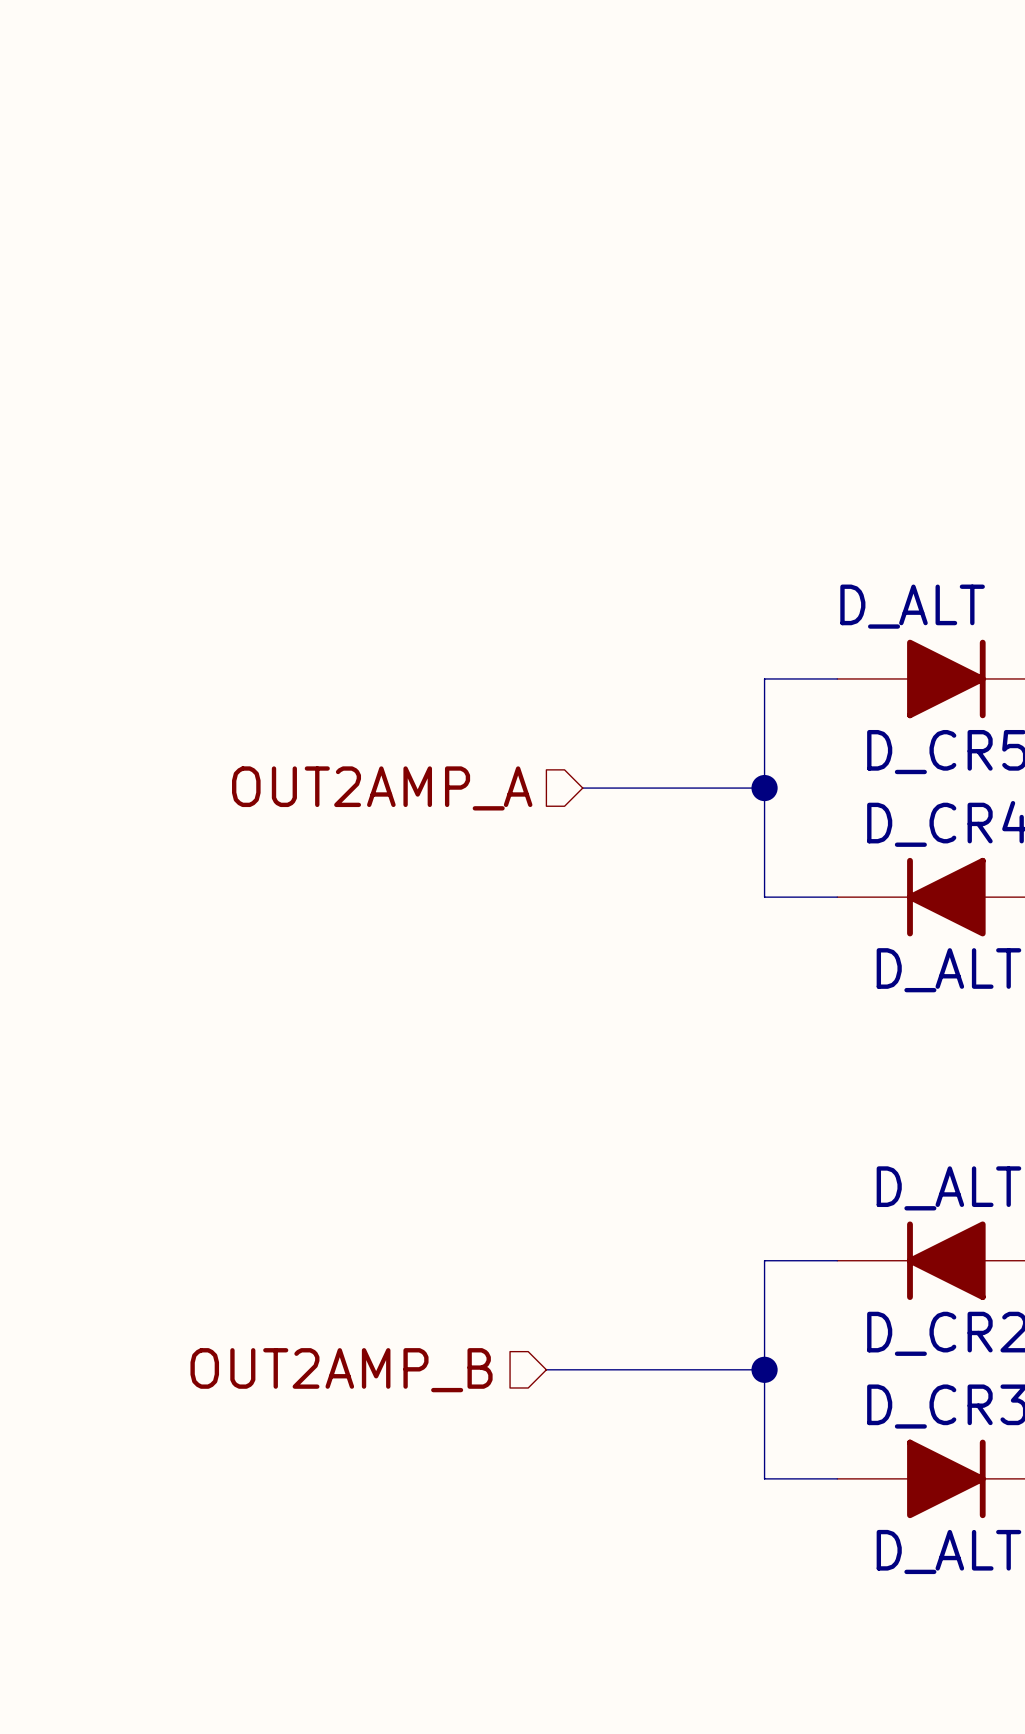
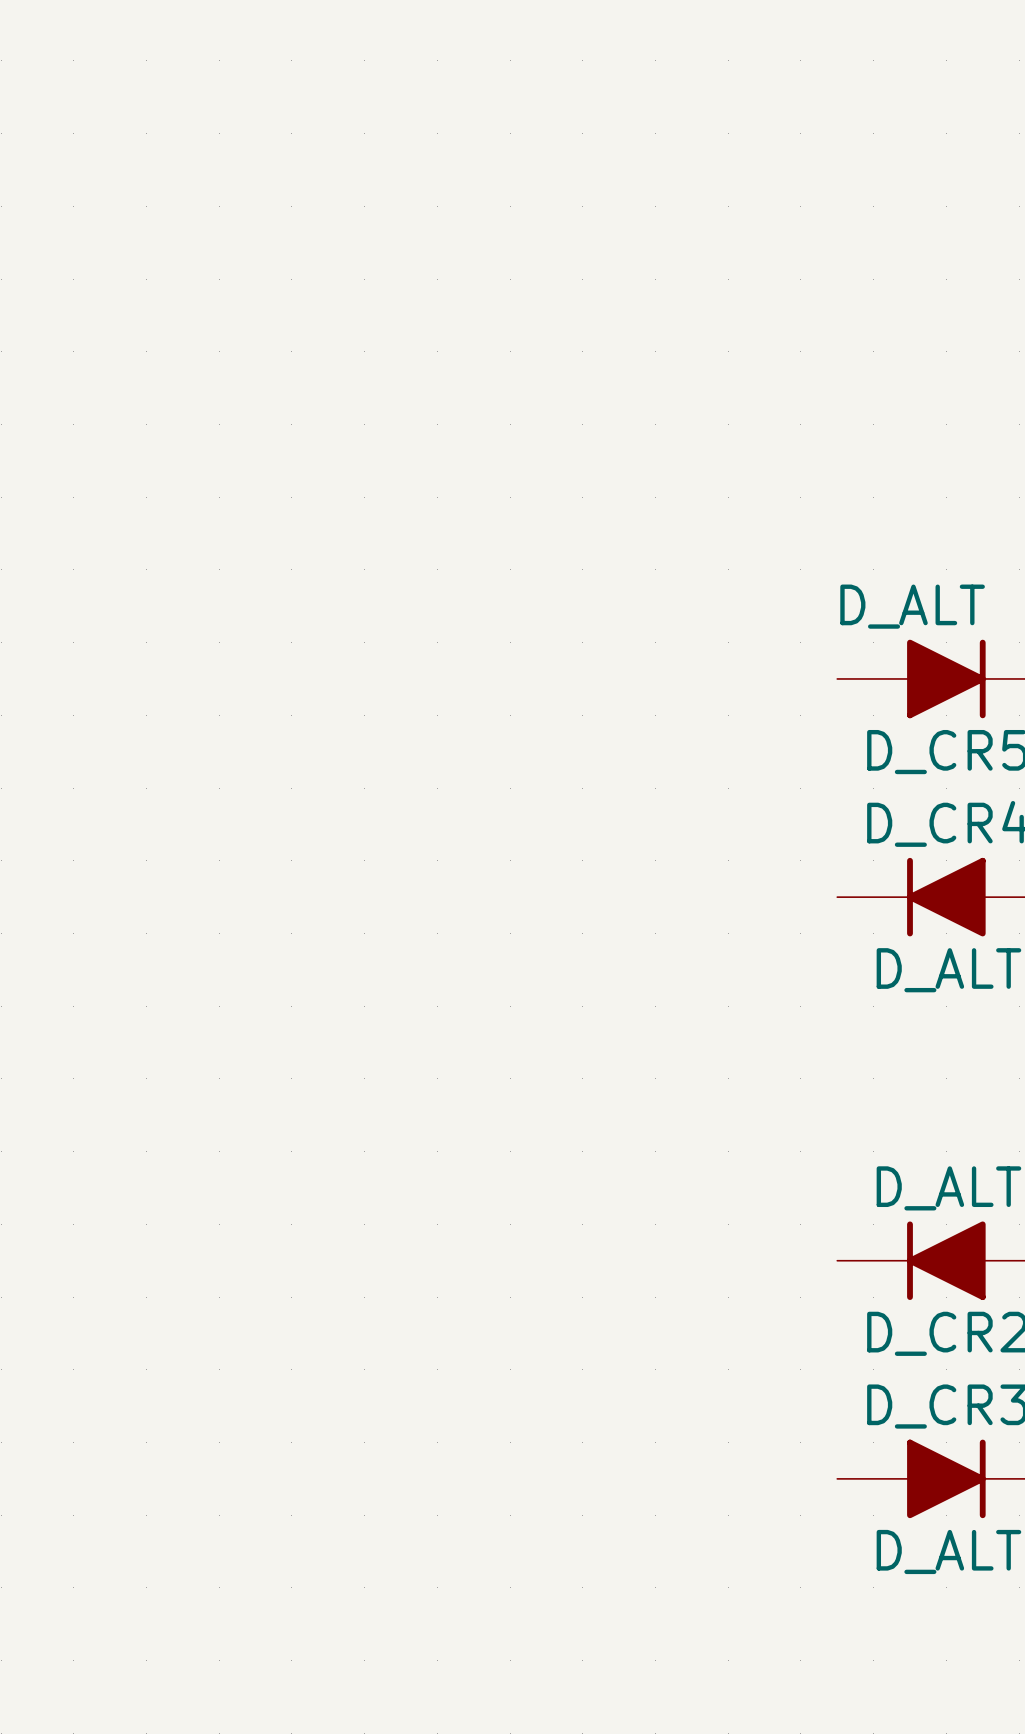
wire: (837, 678) (764, 678) (764, 897) (837, 897) -> none
hierarchical label: OUT2AMP_A (382, 788) -> none
wire: (582, 788) (764, 788) -> none
junction: (764, 788) -> none
wire: (837, 1260) (764, 1260) (764, 1478) (837, 1478) -> none
wire: (546, 1369) (764, 1369) -> none
junction: (764, 1369) -> none
hierarchical label: OUT2AMP_B (341, 1370) -> none

